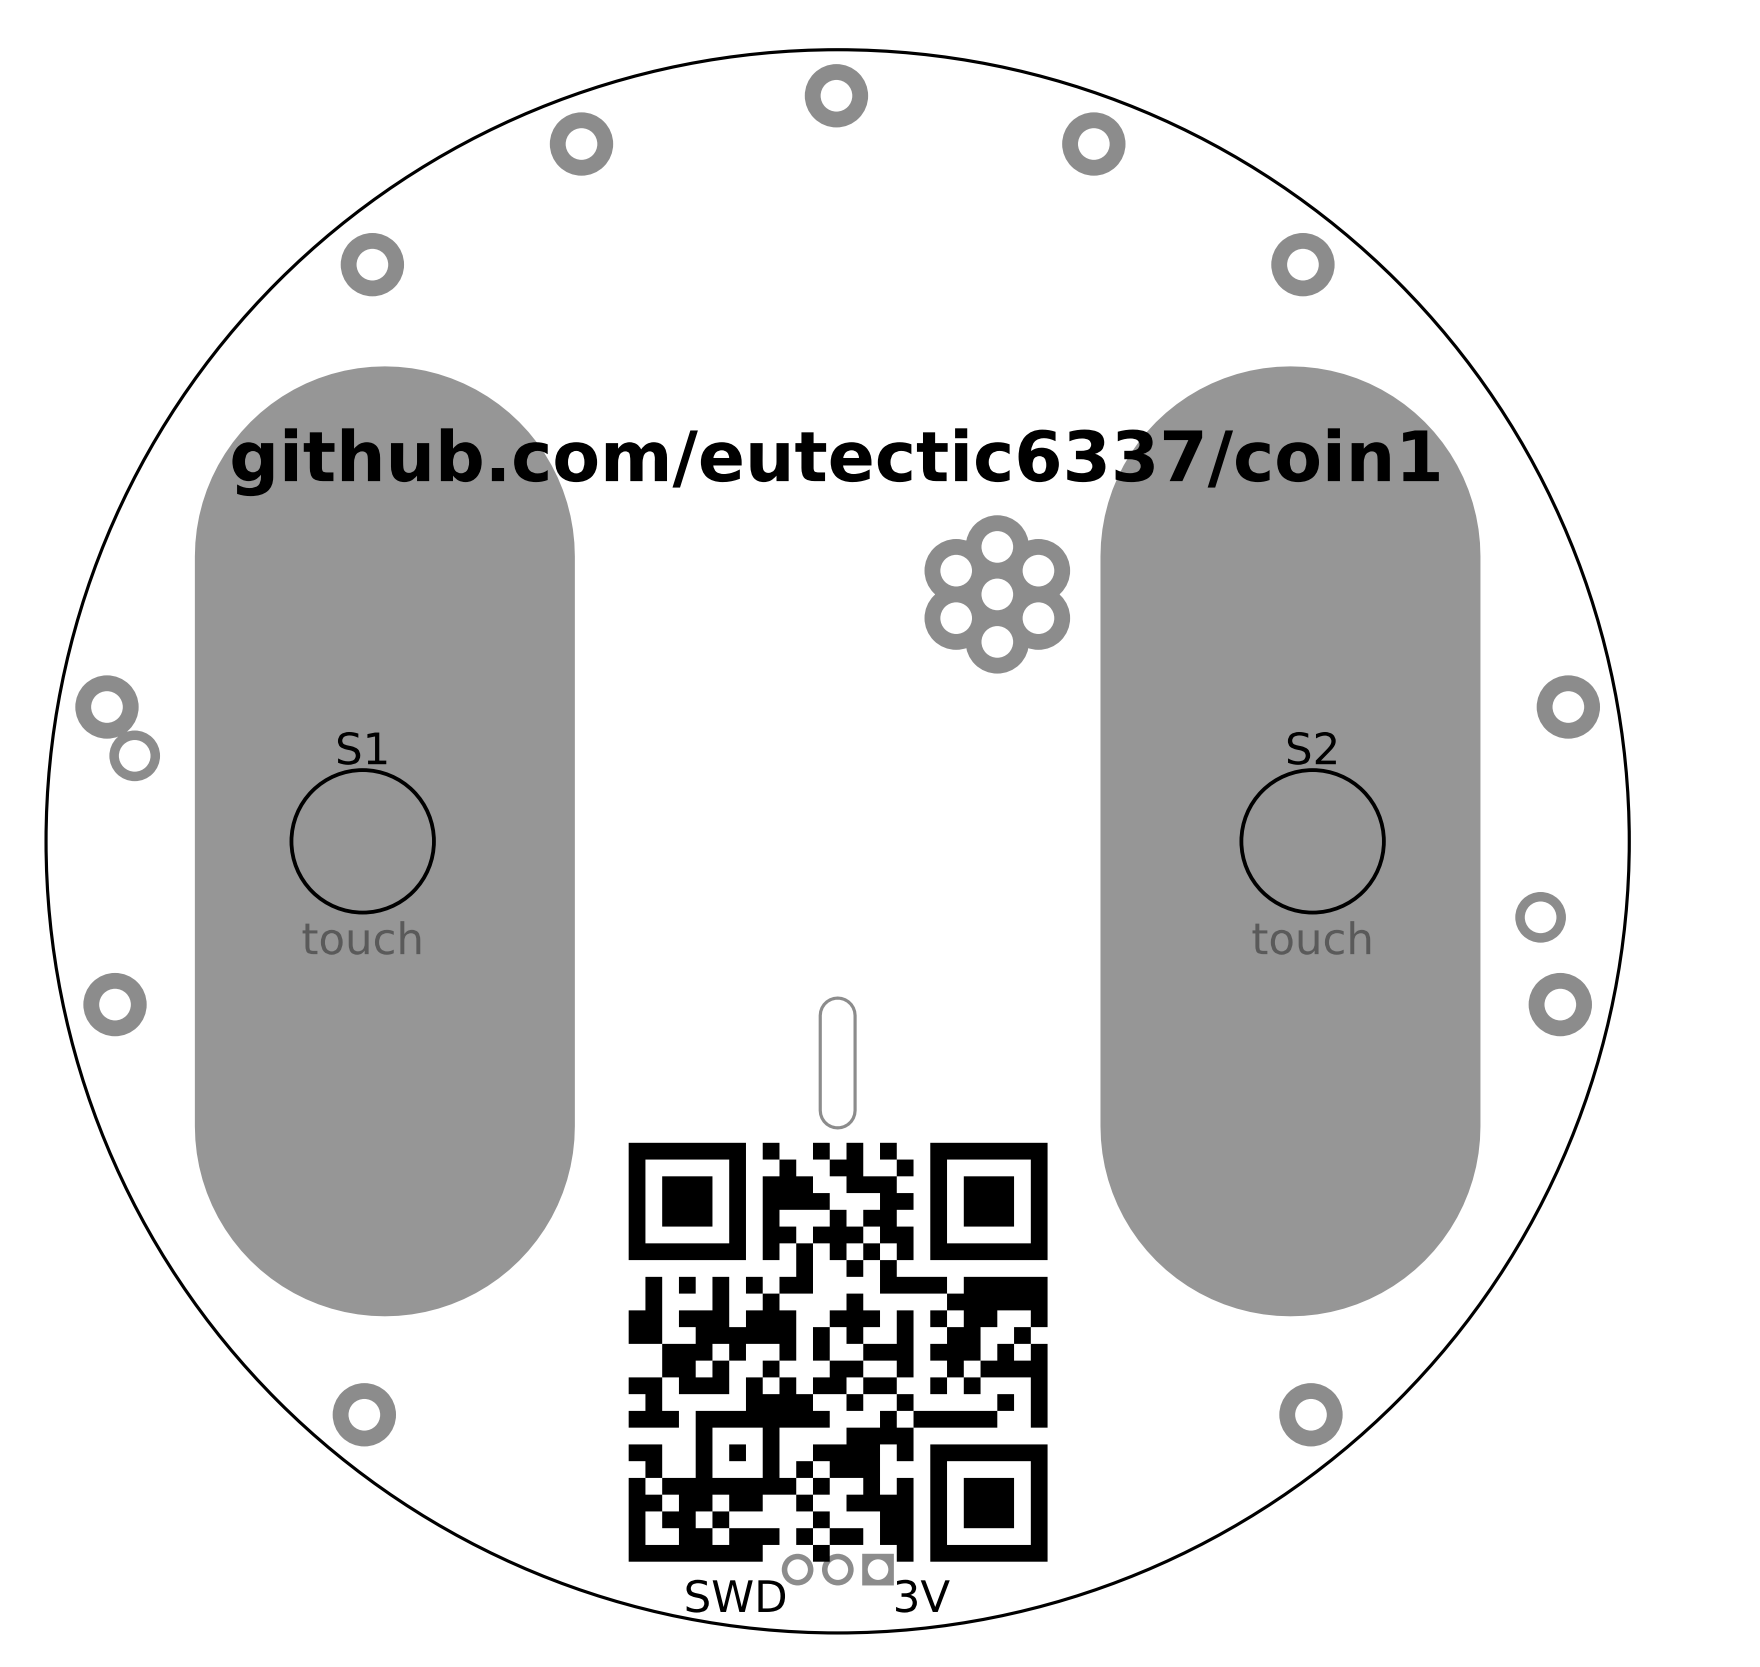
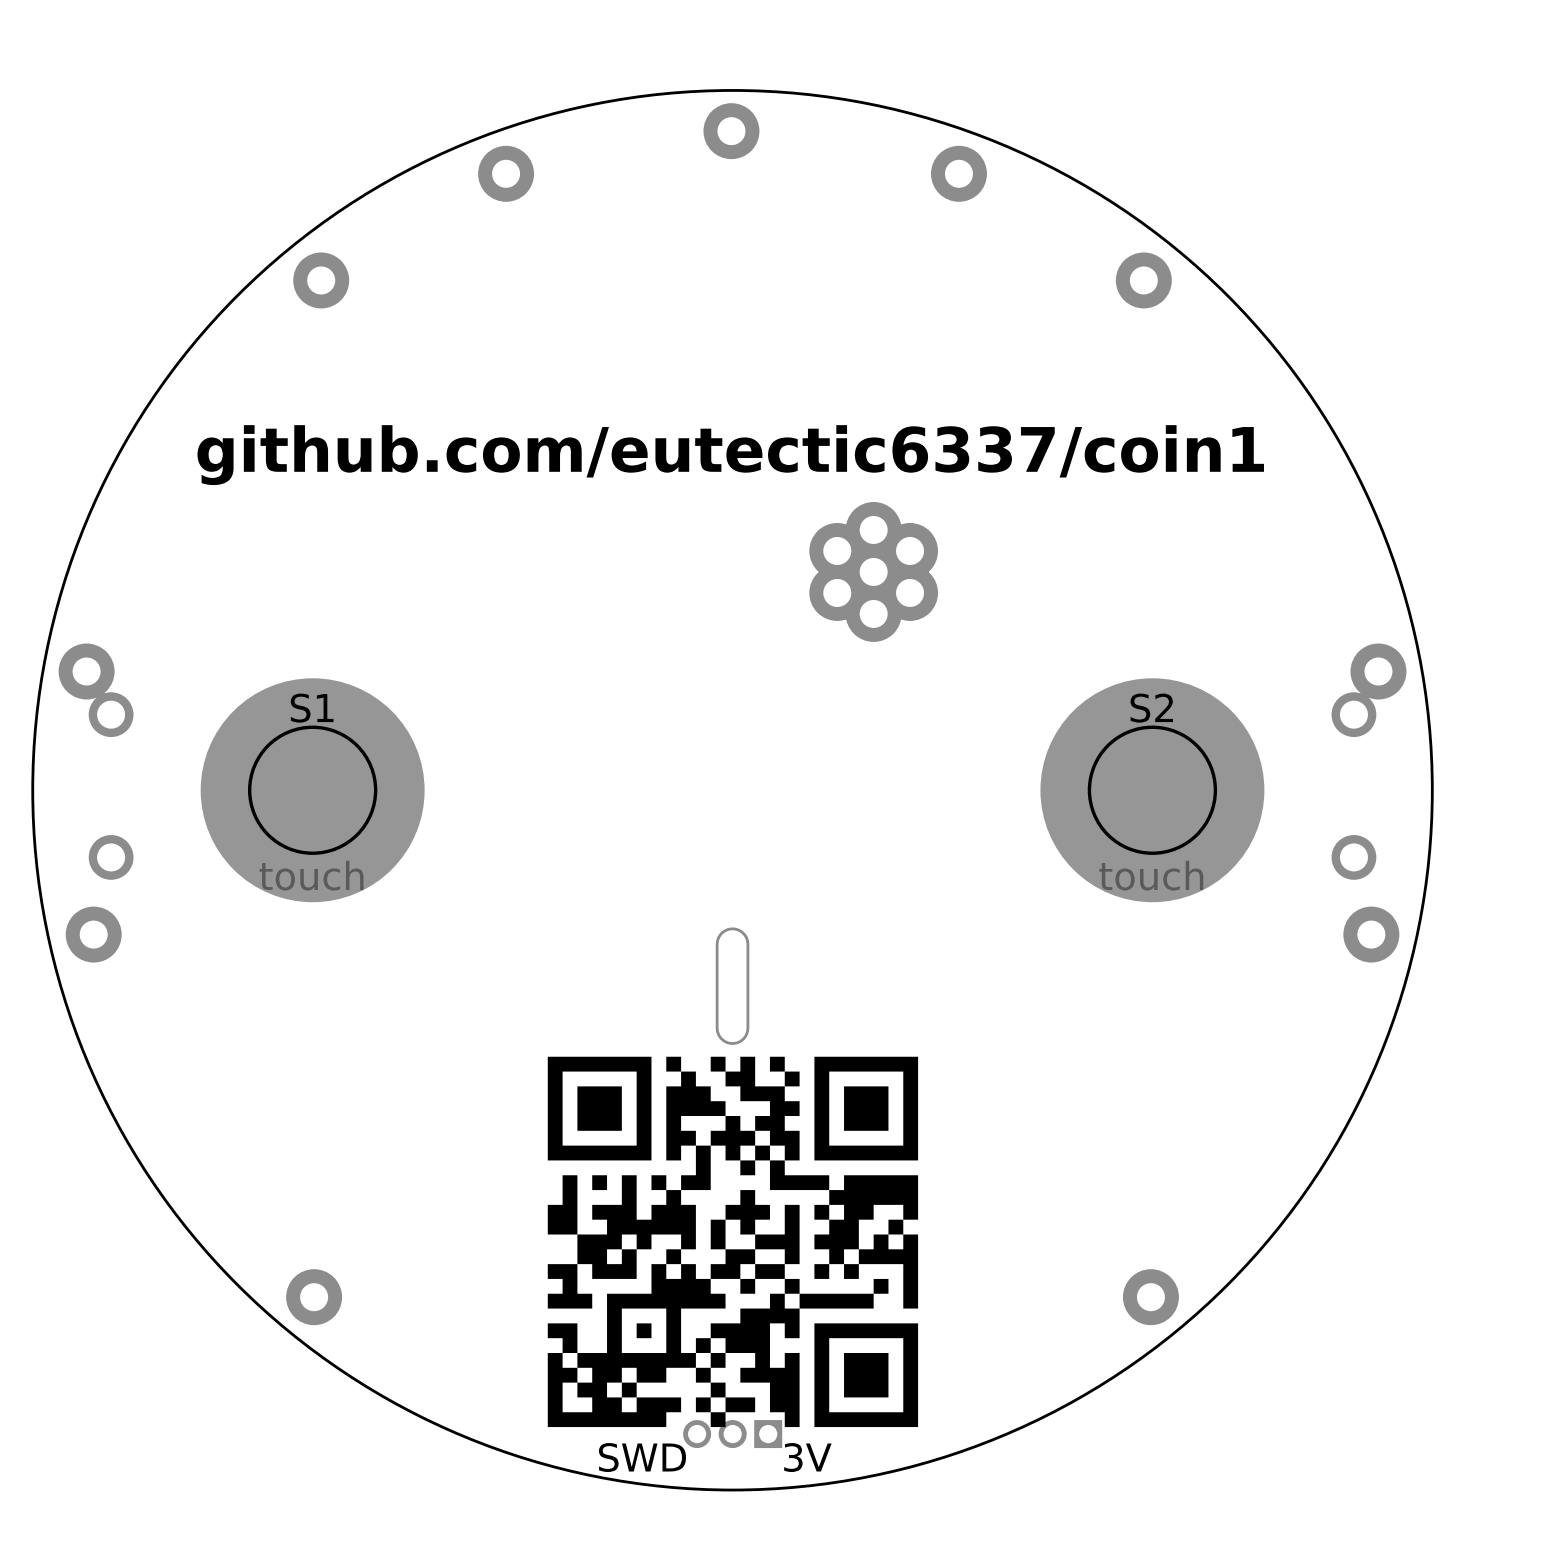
S1 footprint: [194, 366, 575, 1317] -> [200, 678, 425, 903]
S2 footprint: [1100, 366, 1481, 1317] -> [1040, 678, 1265, 903]
part: none -> (1353, 714)
part: none -> (111, 857)

